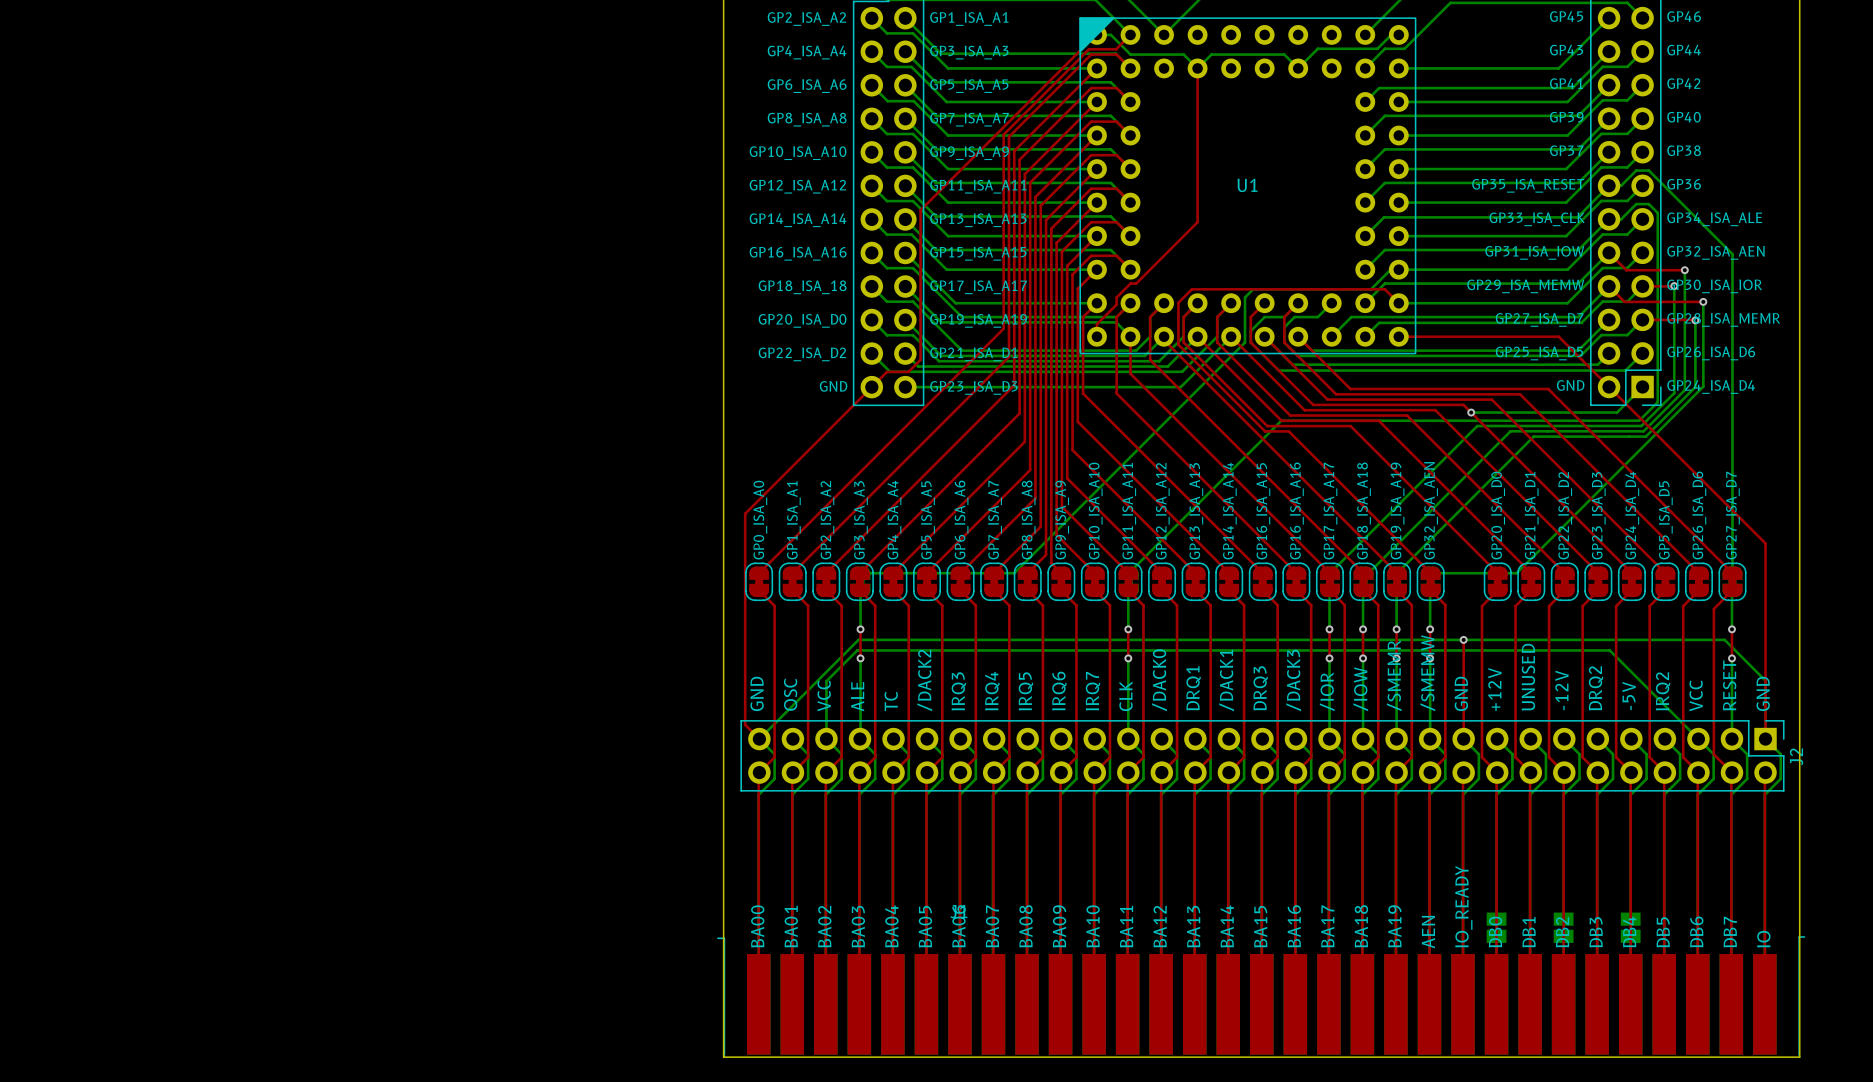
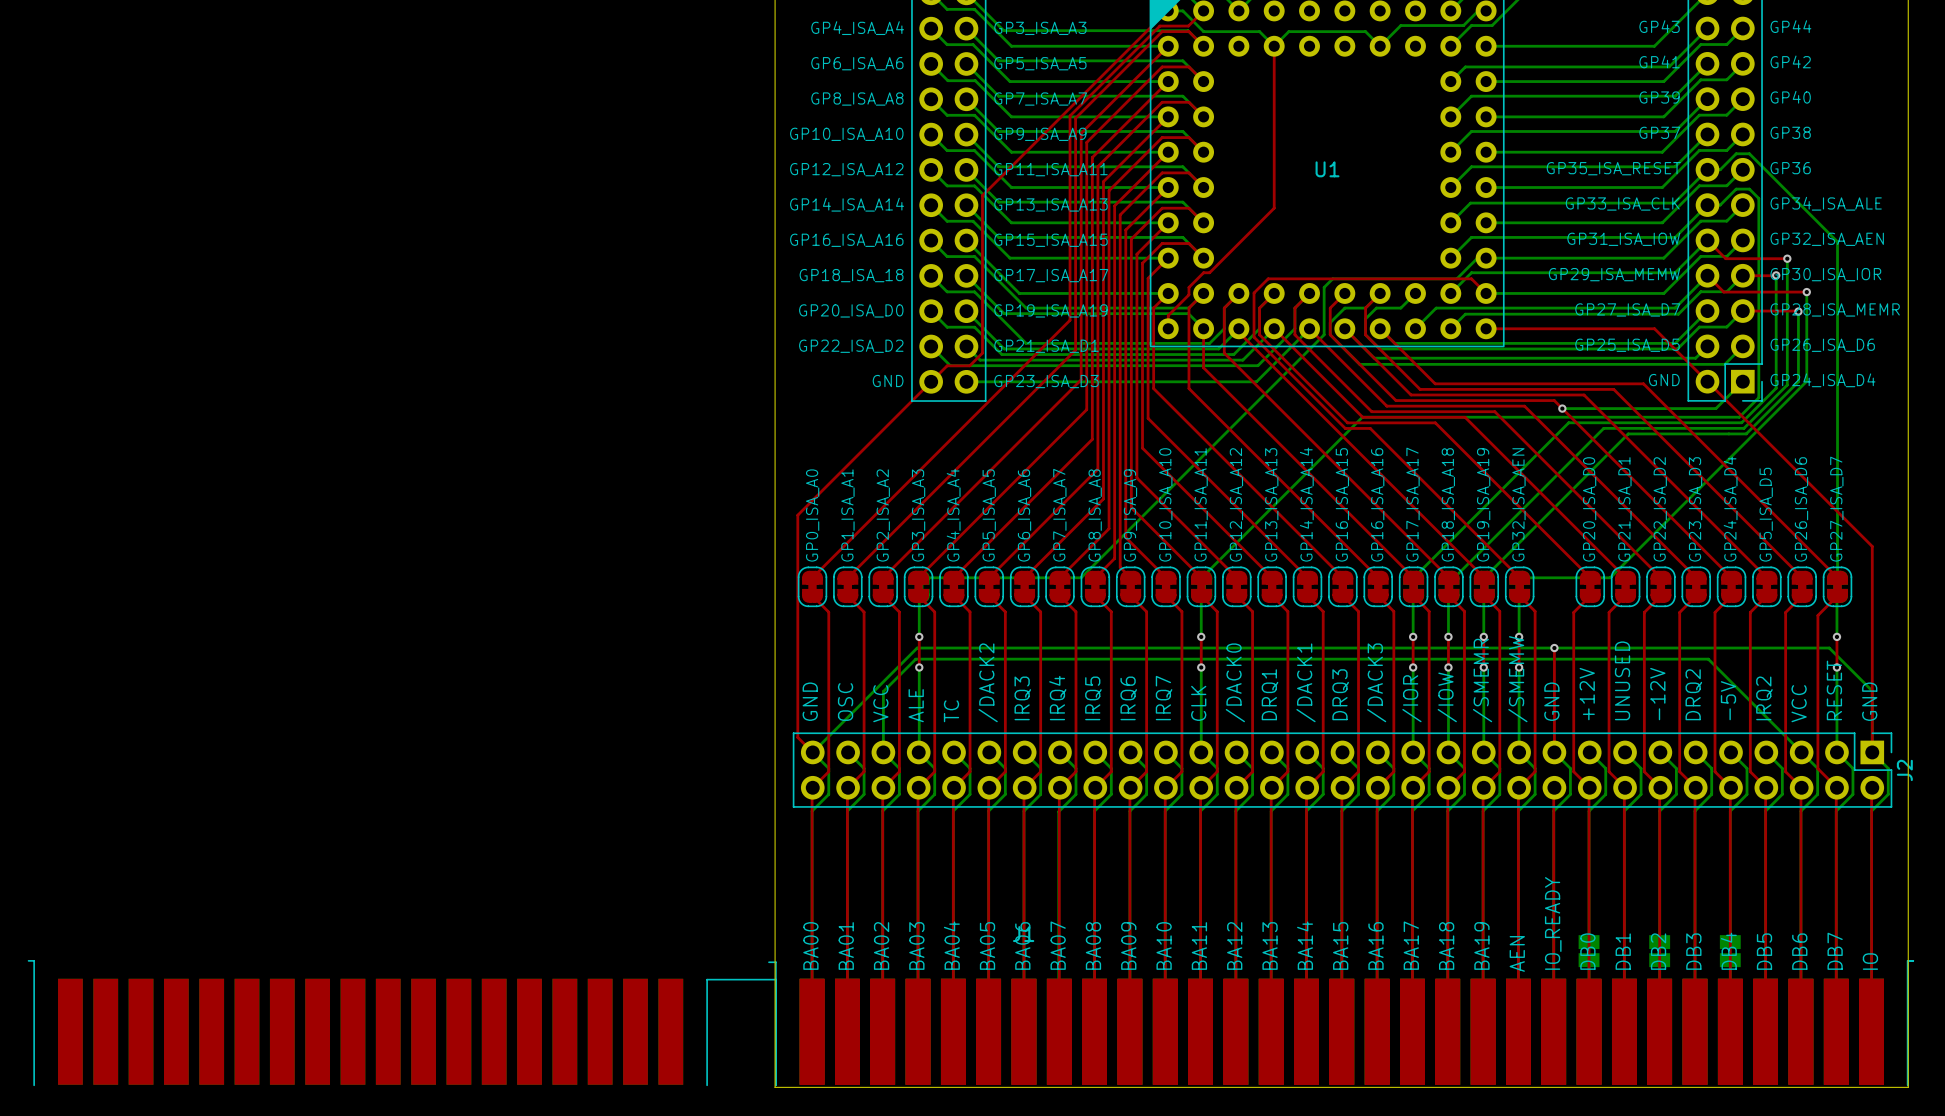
part: none -> (970, 1023)

